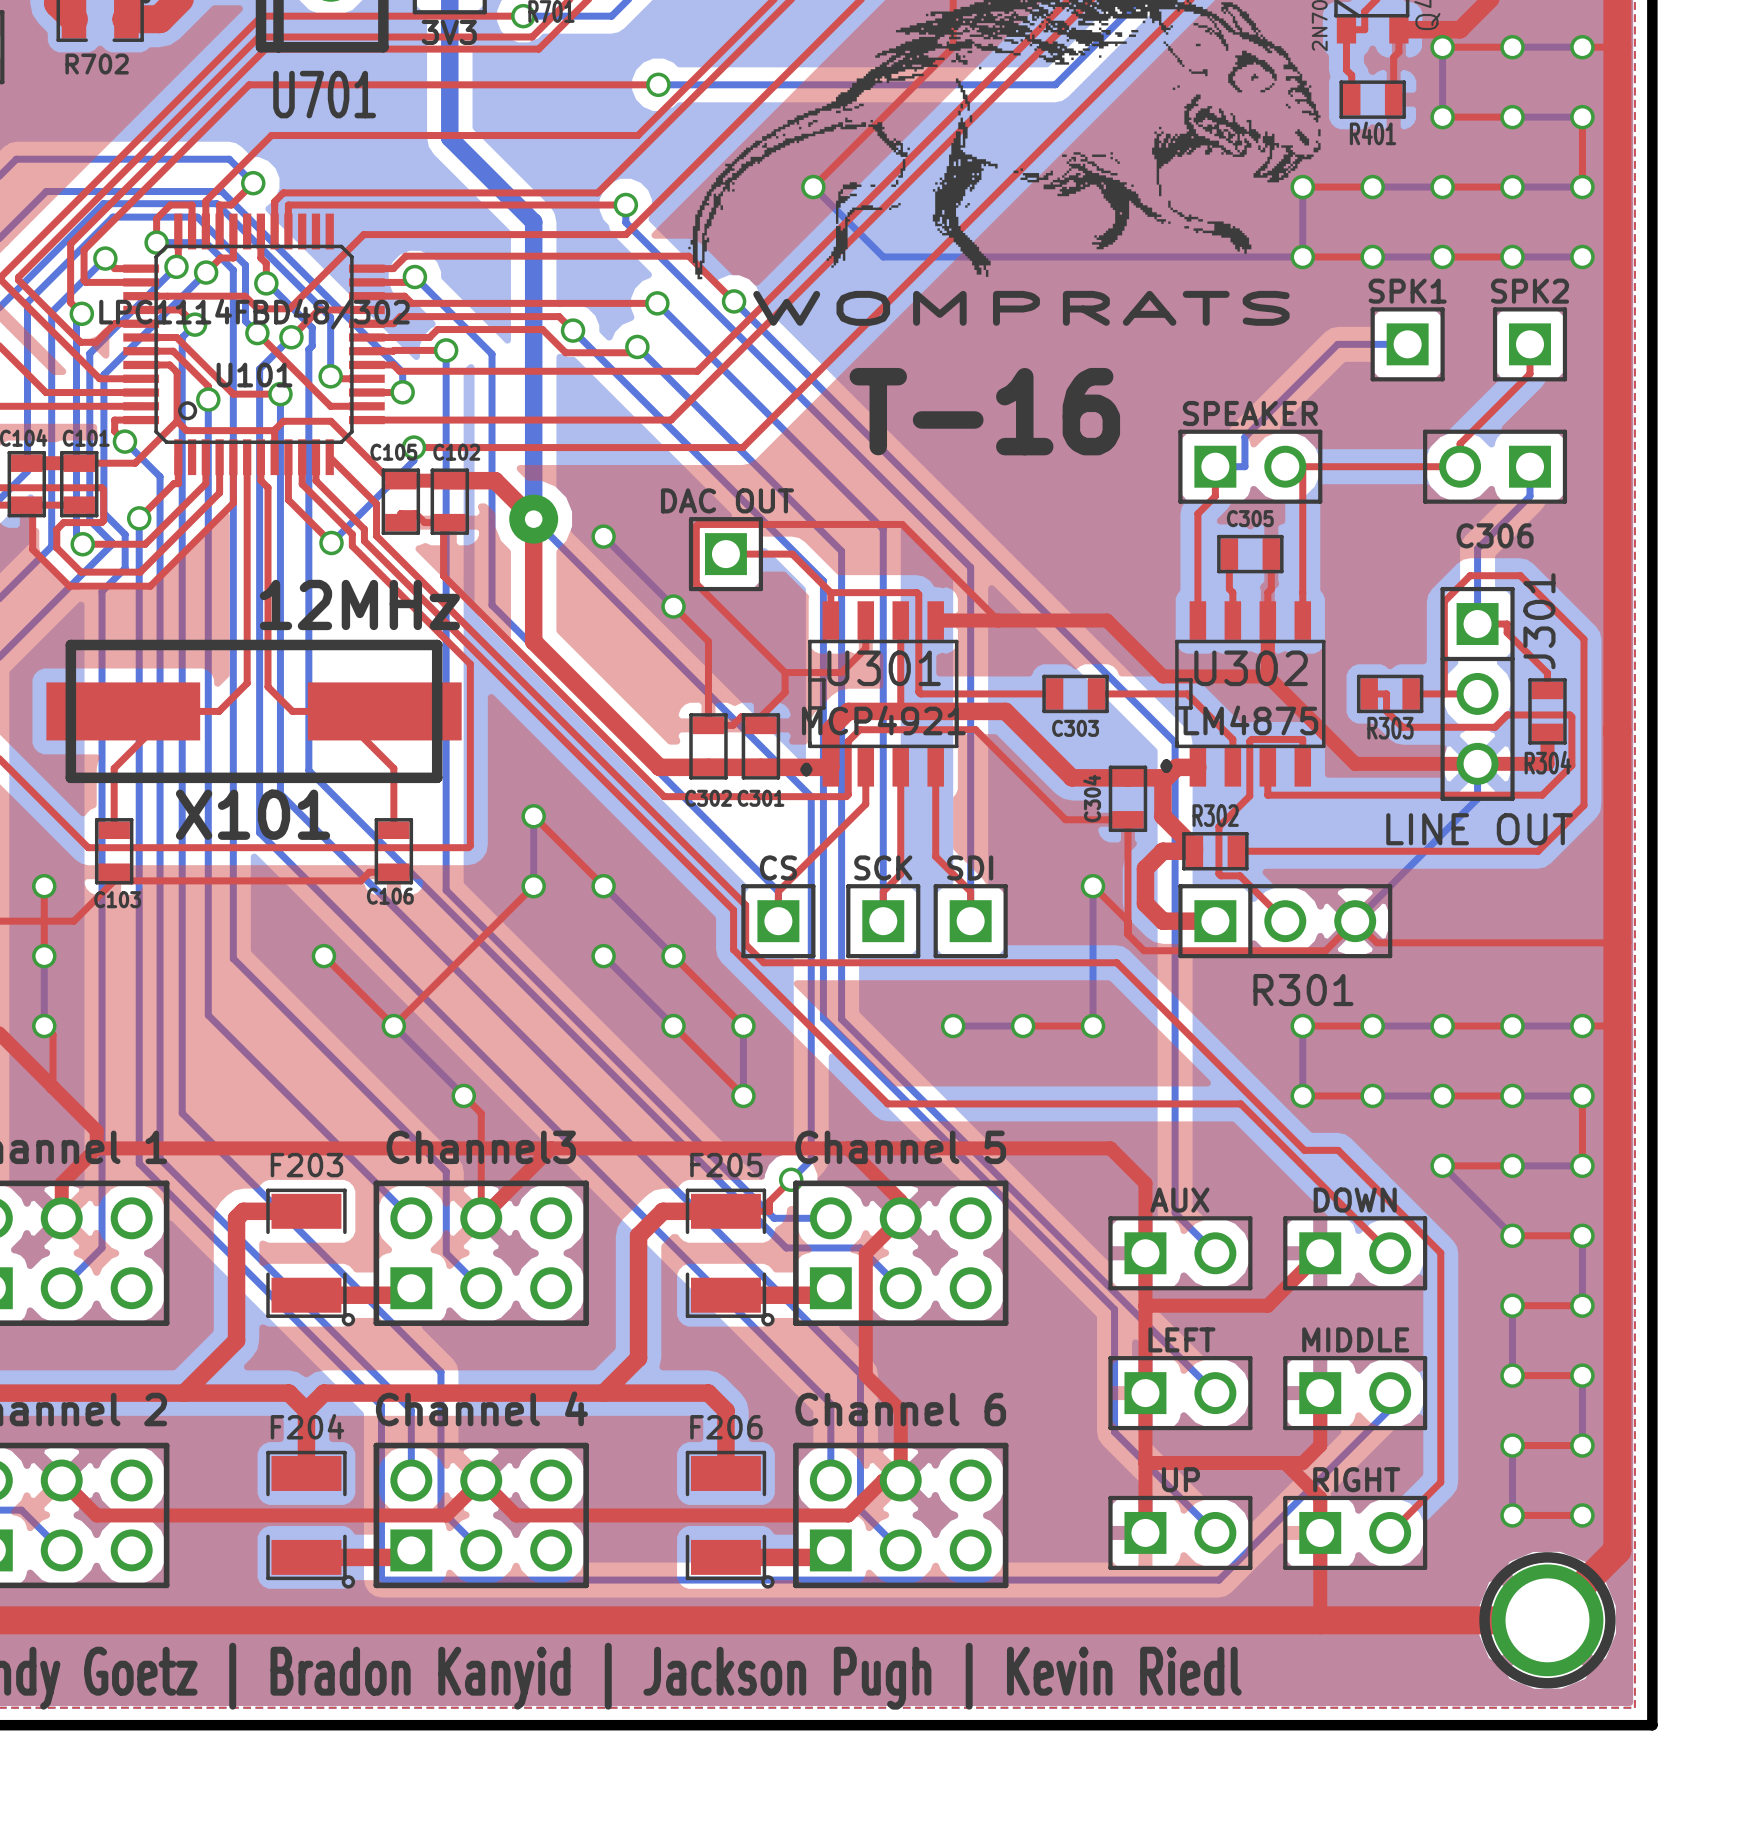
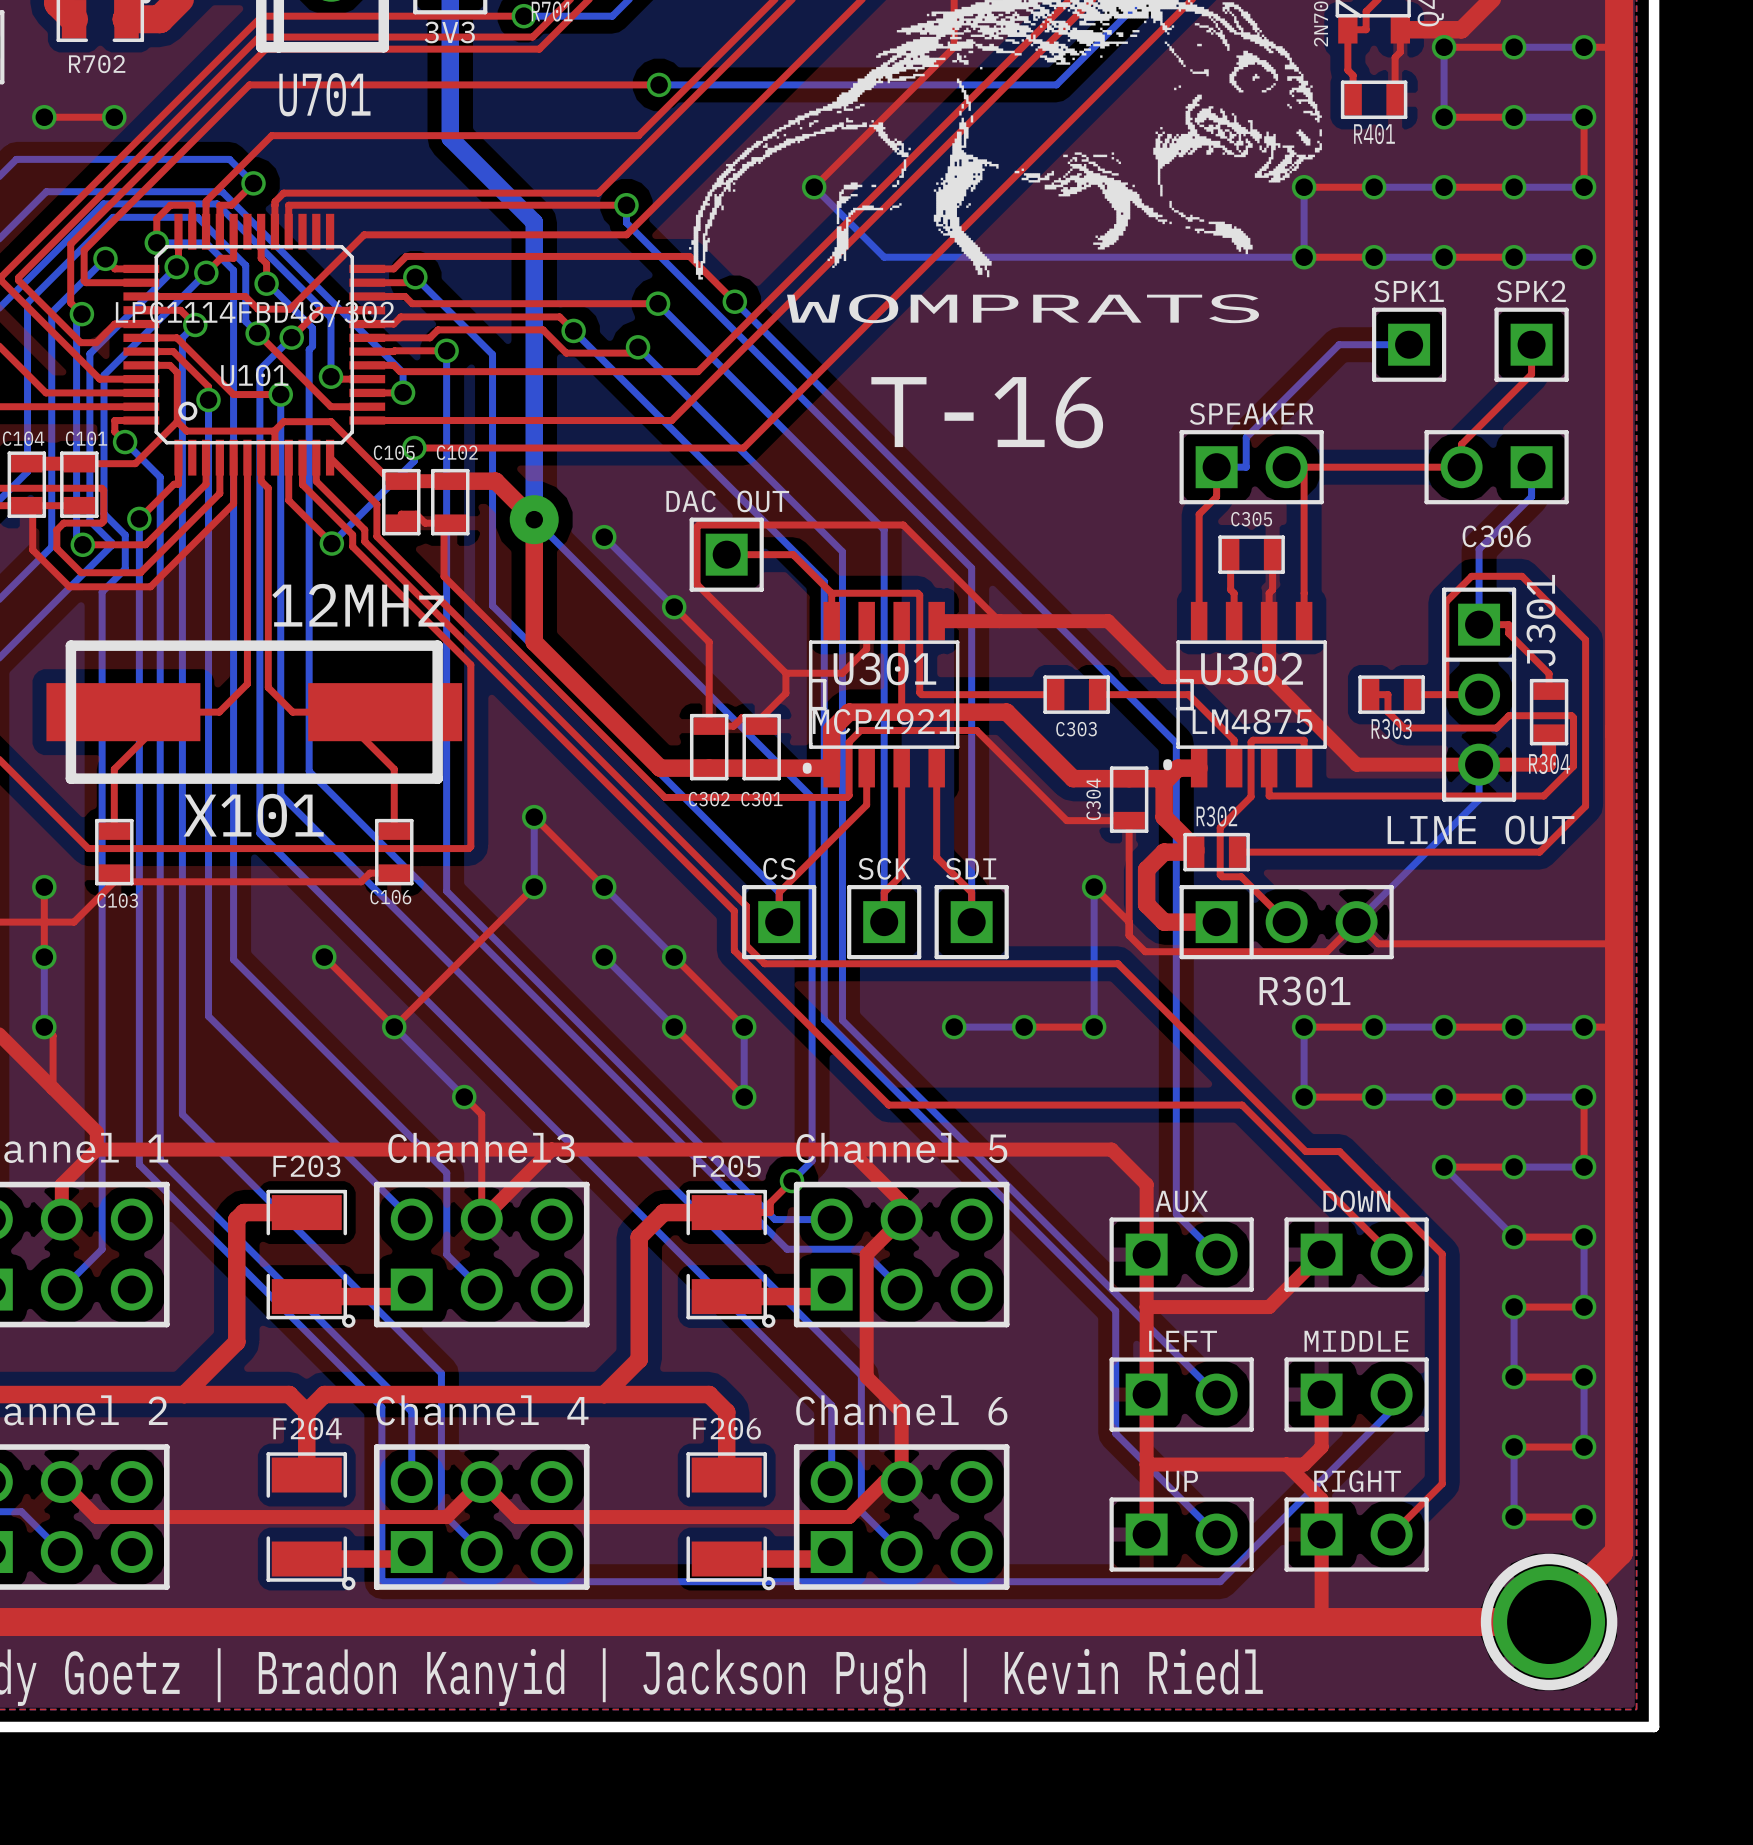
top track: none -> (44, 117) (114, 117)
via: none -> (44, 117)
via: none -> (114, 117)

